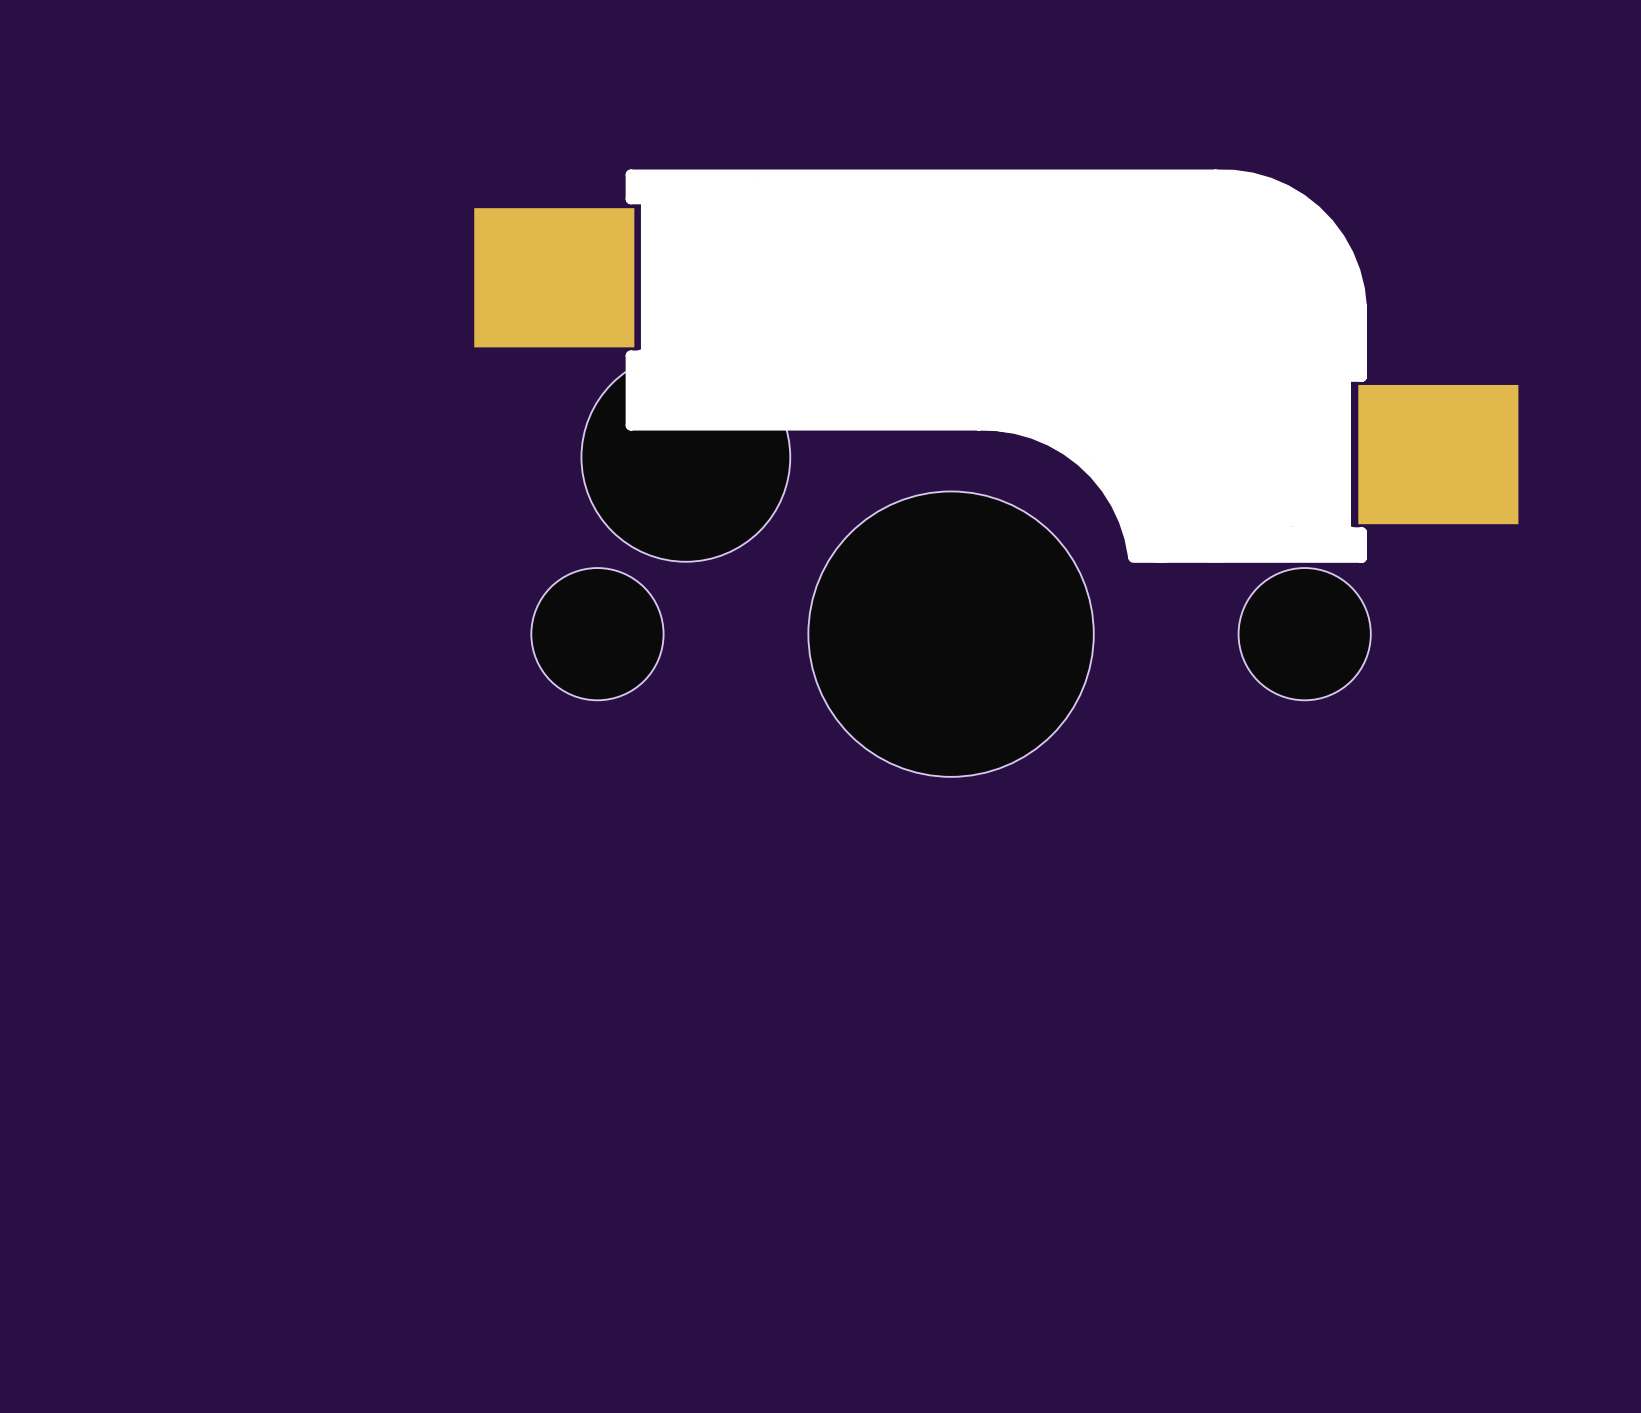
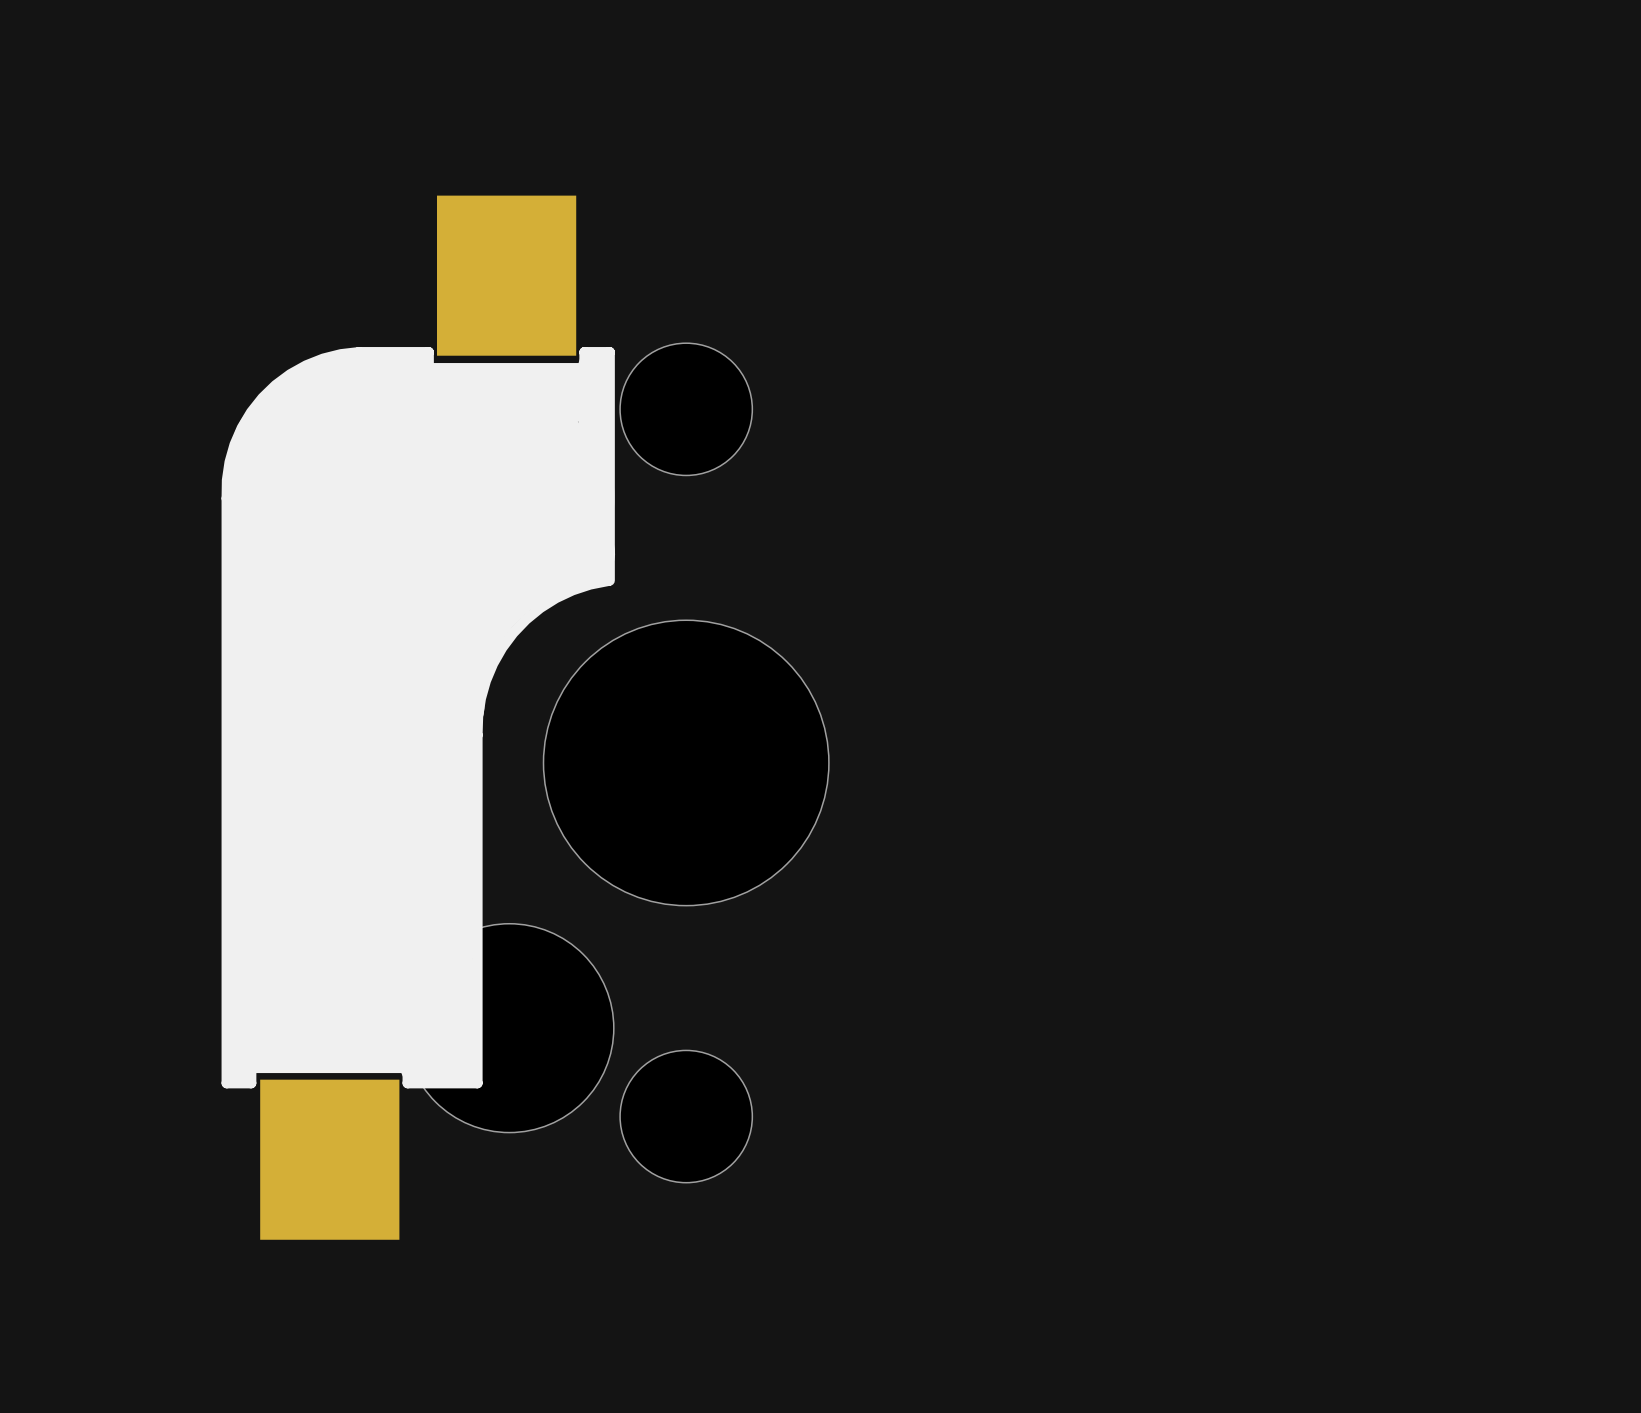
part rotation: 0° (996, 473) -> 90° counterclockwise (525, 717)

